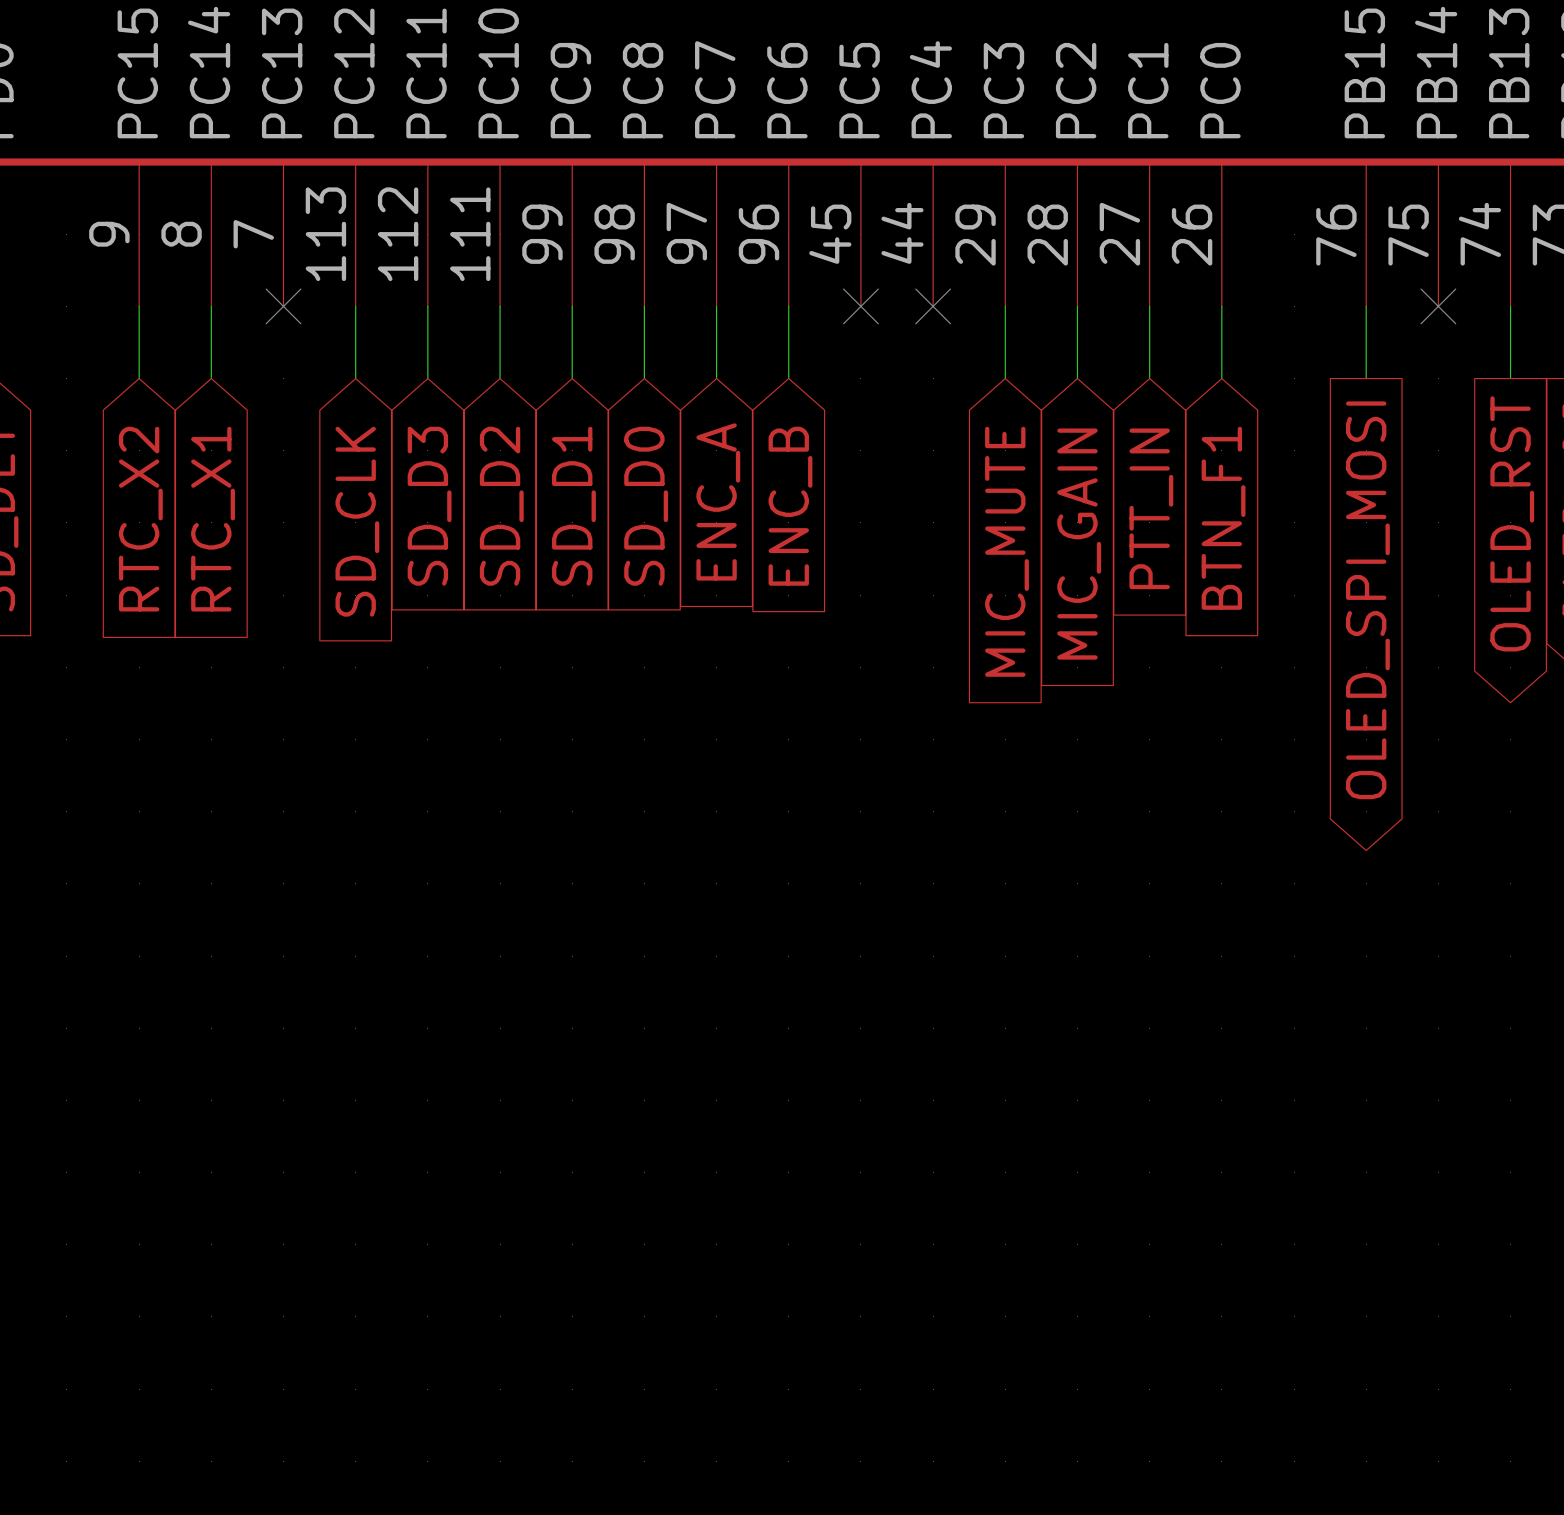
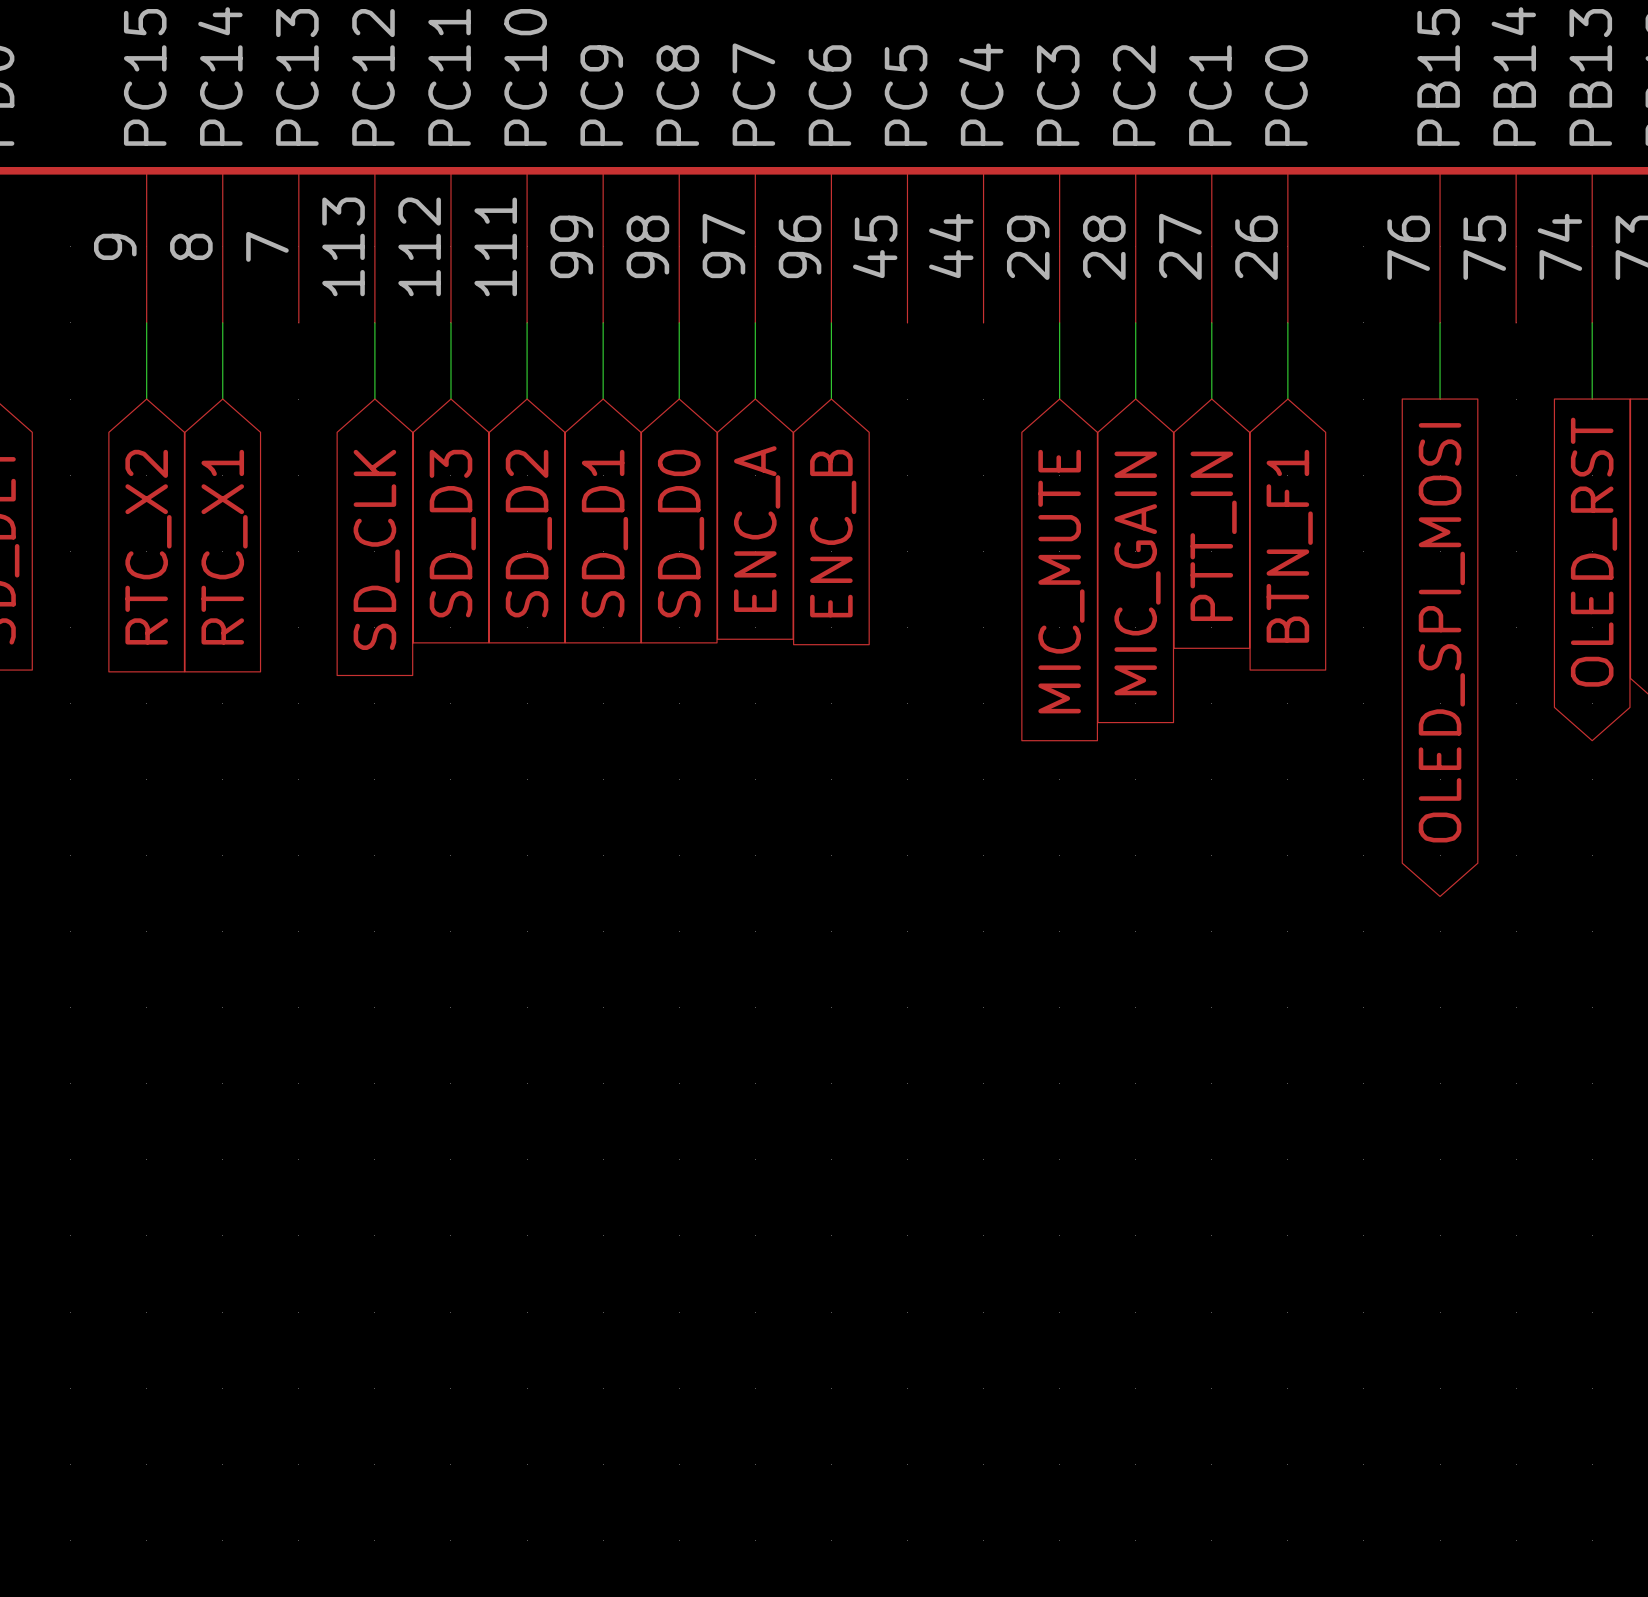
no-connect mark: (283, 306) -> none
no-connect mark: (860, 306) -> none
no-connect mark: (933, 306) -> none
no-connect mark: (1438, 306) -> none

